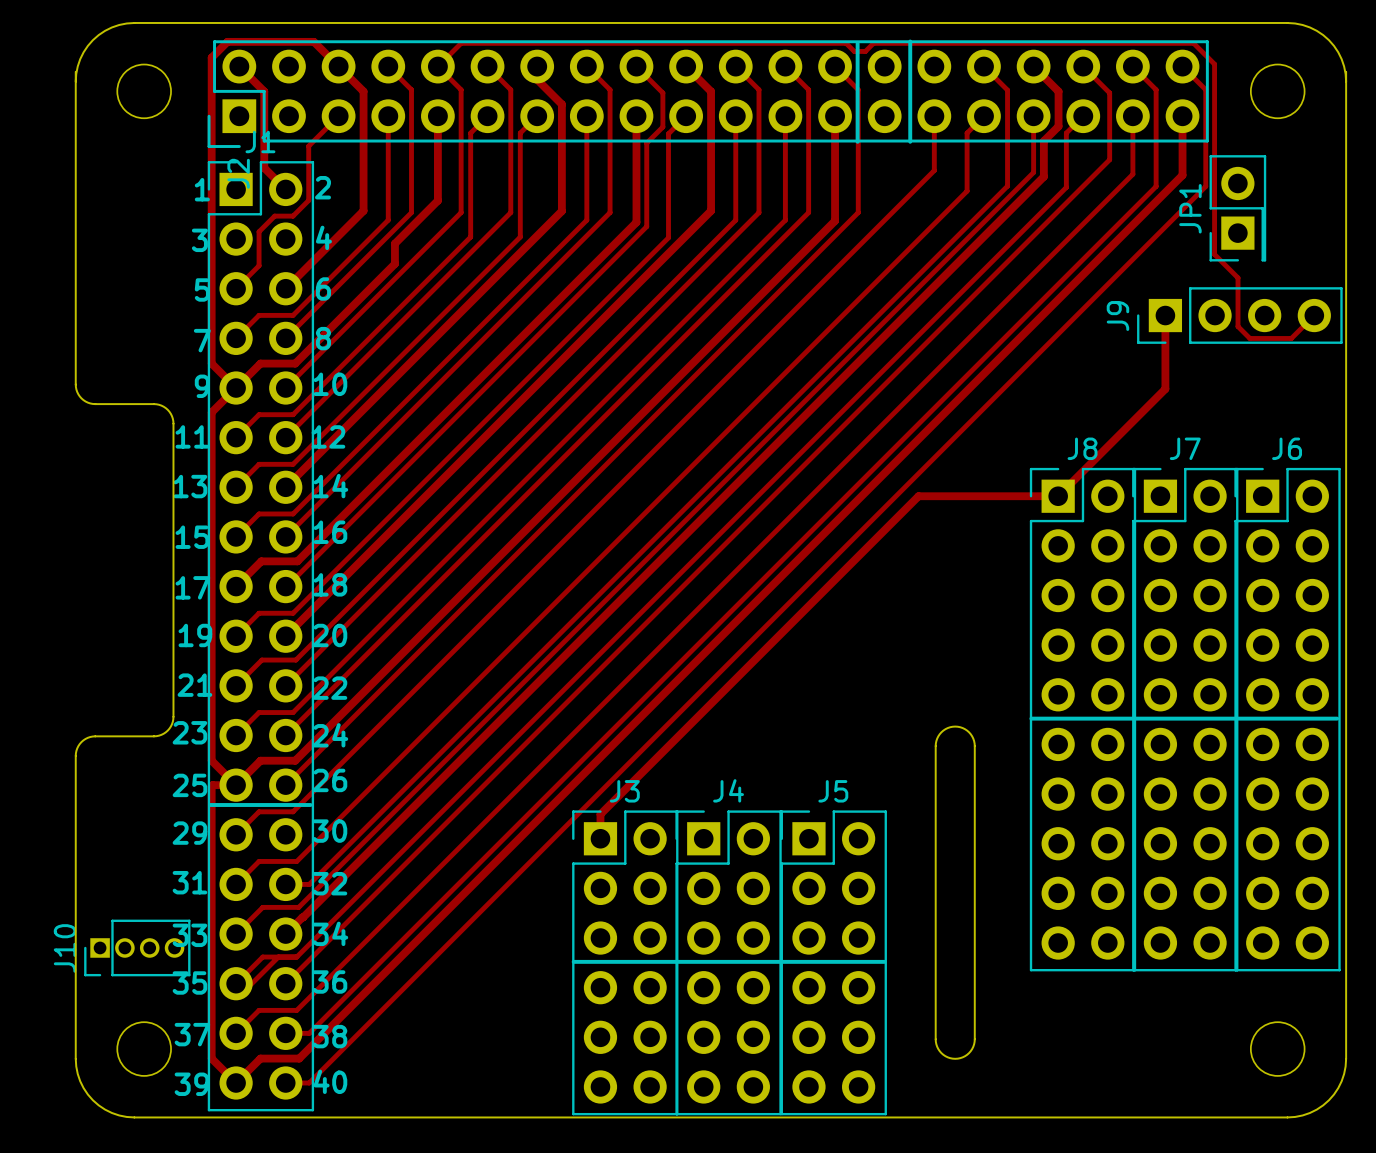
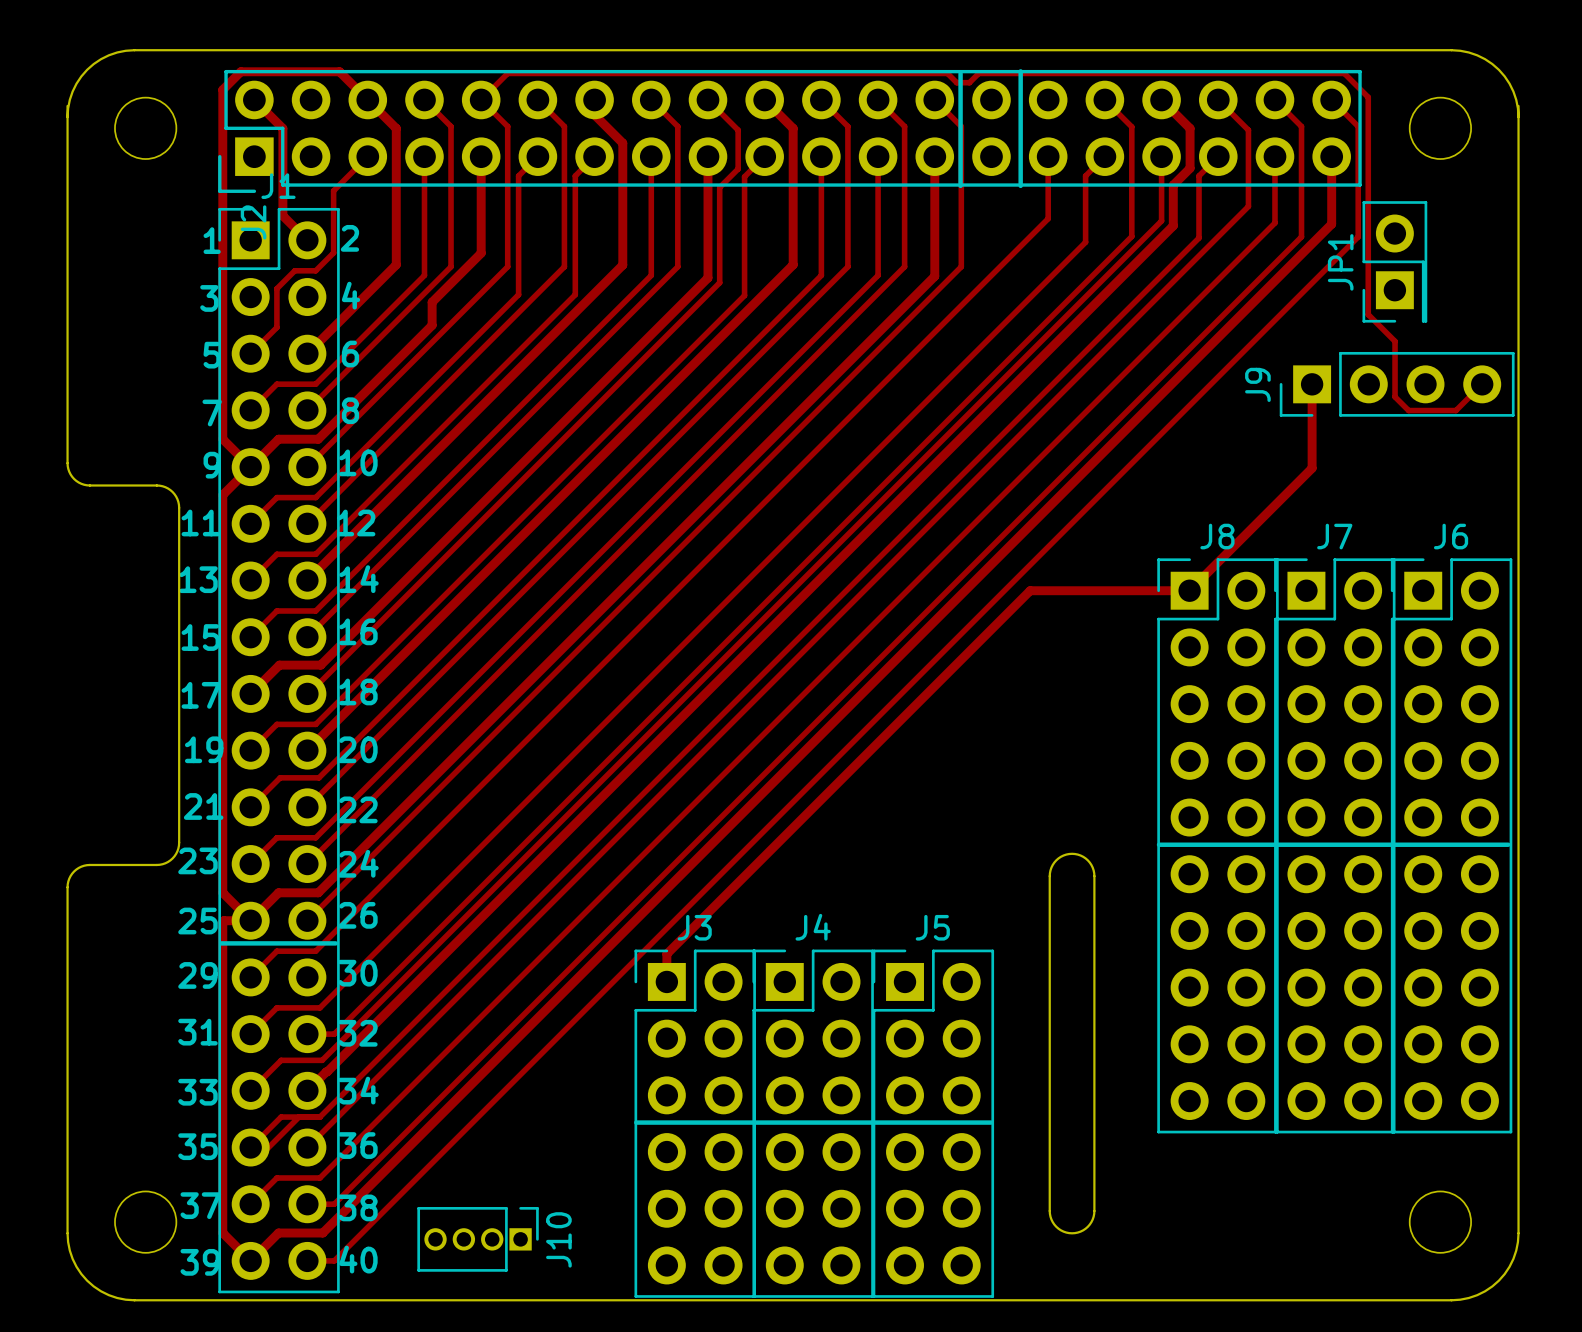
J10 rotation: 0° (137, 947) -> 180° (478, 1239)
J10 position: (137, 947) -> (478, 1239)

